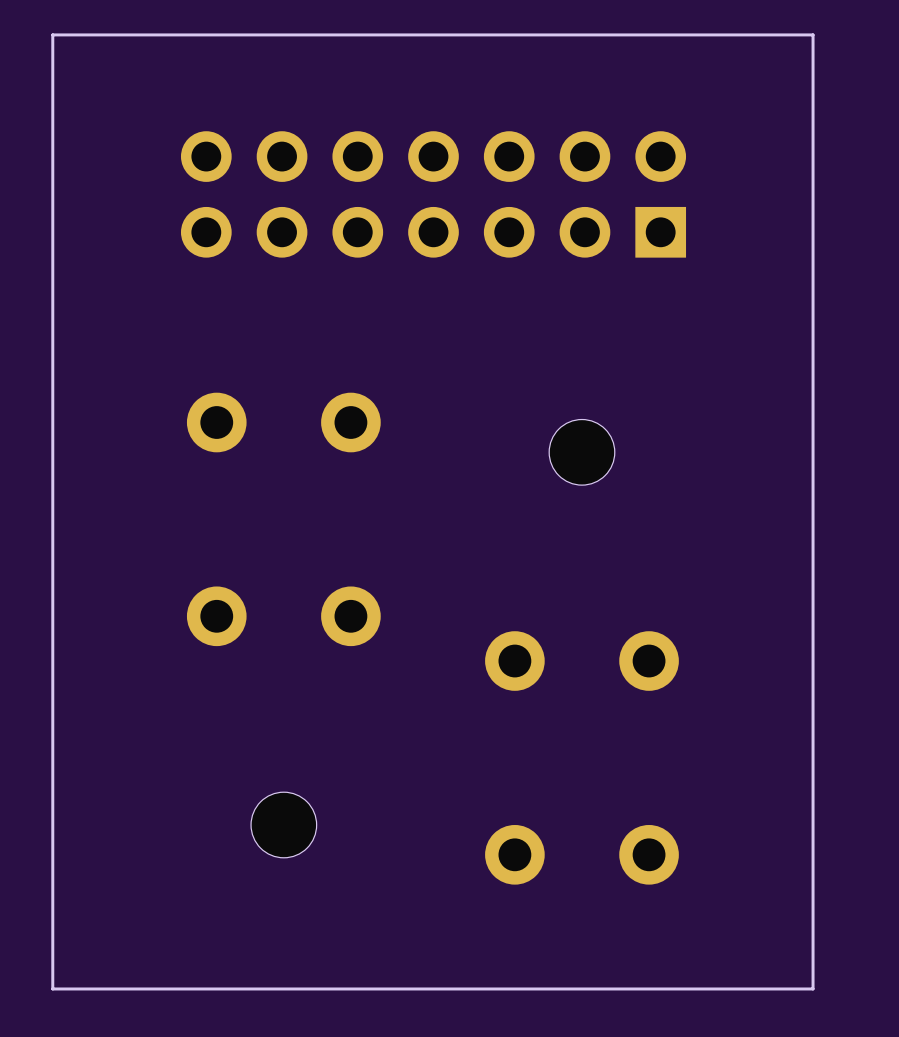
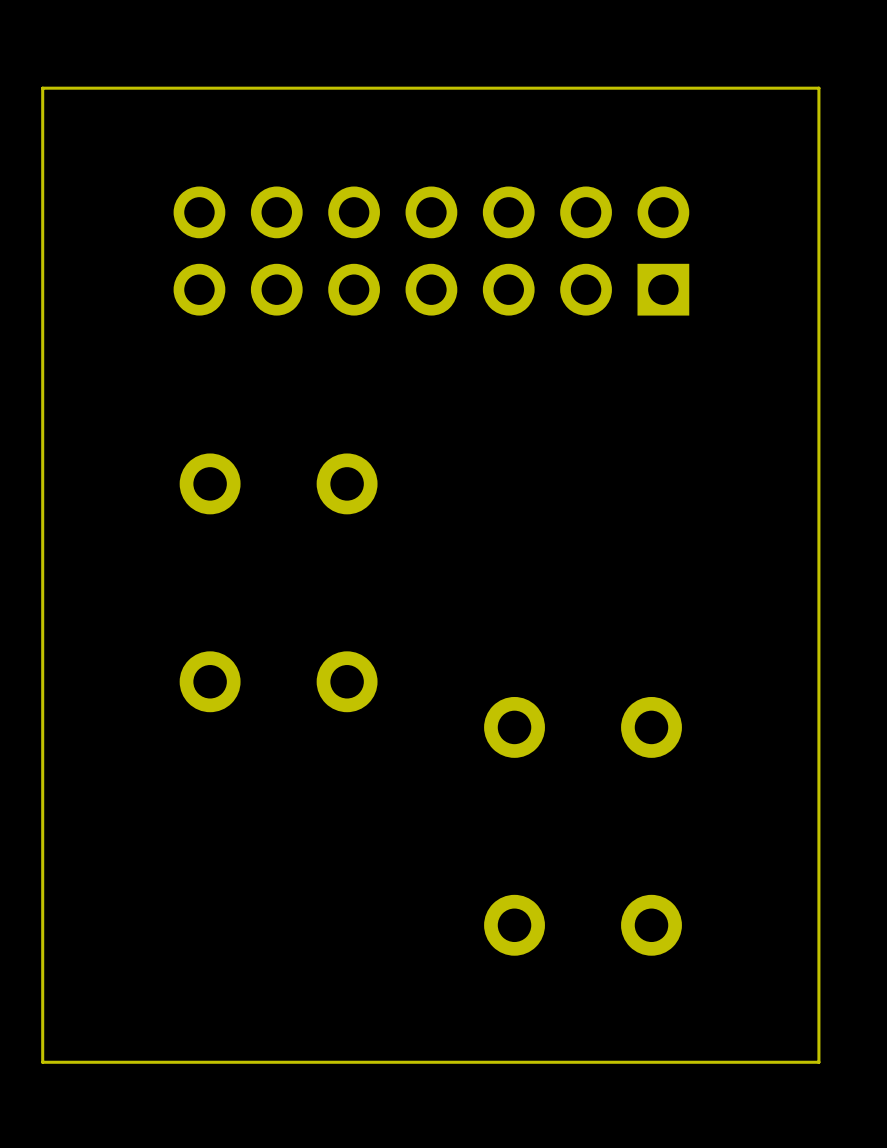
part: (581, 452) -> none
part: (283, 825) -> none

